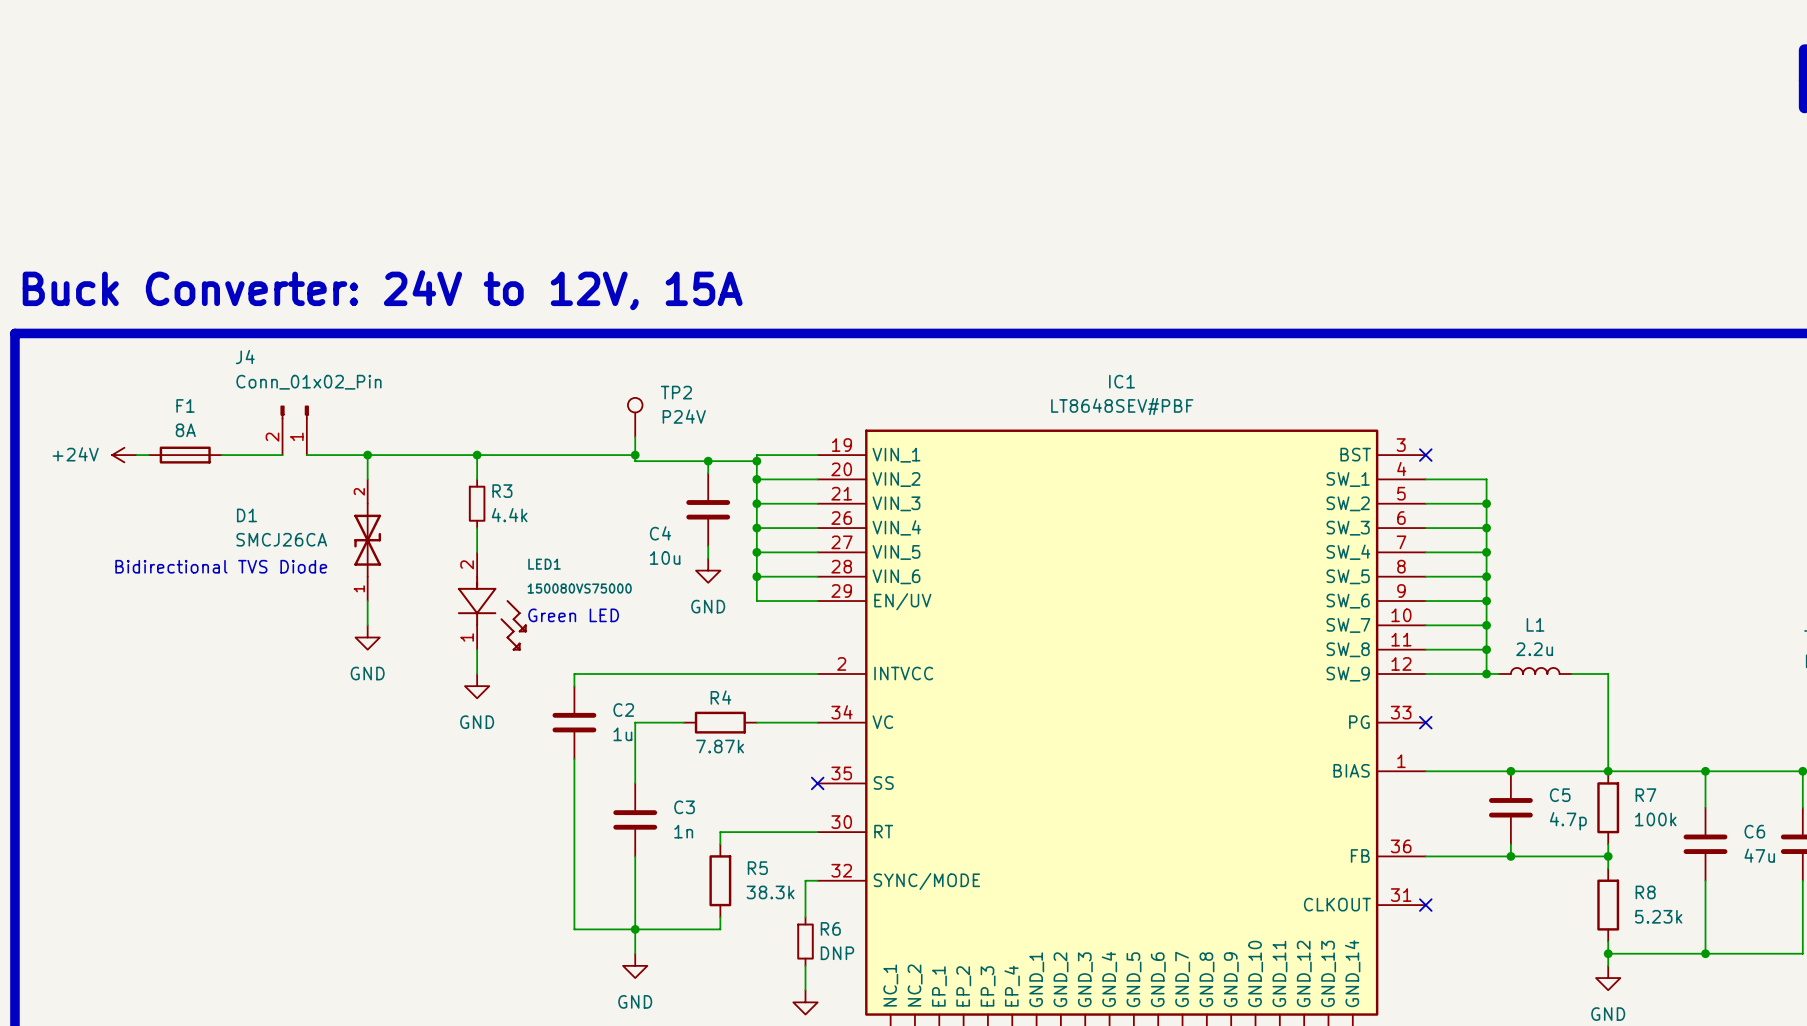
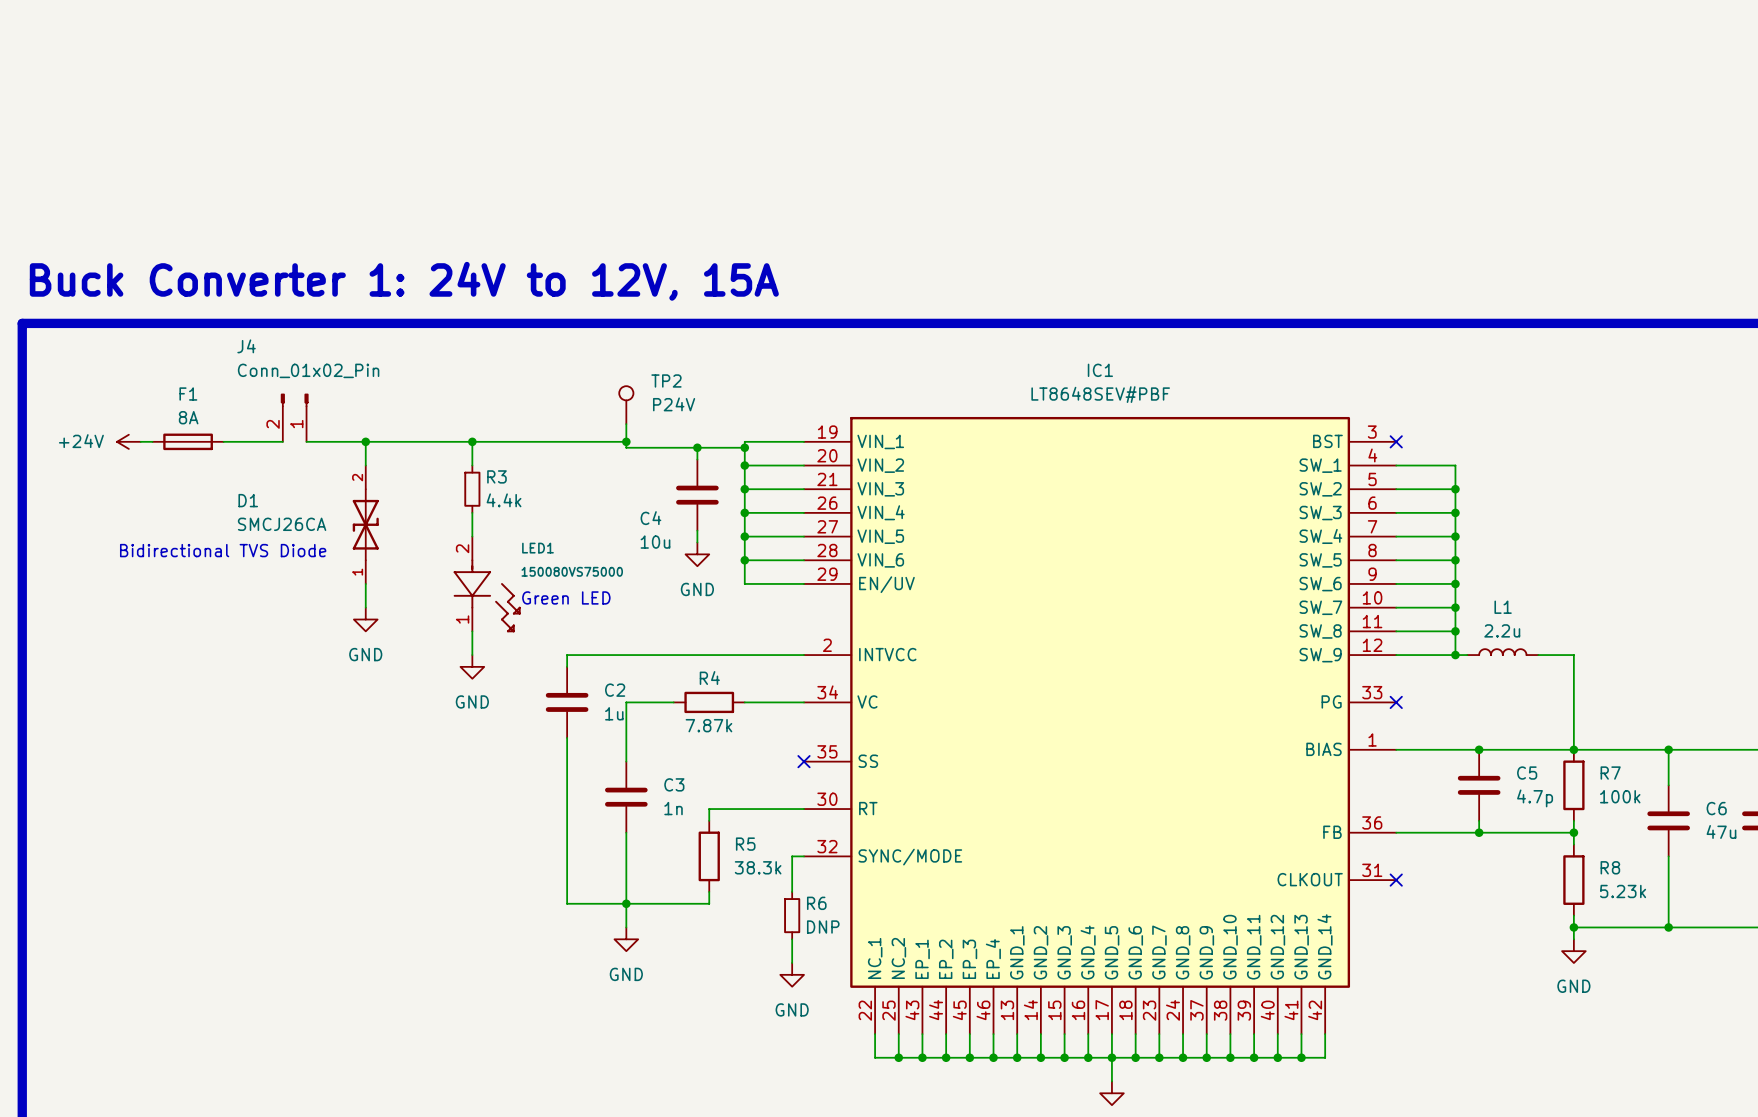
text: Buck Converter: 24V to 12V, 15A (382, 290) -> Buck Converter 1: 24V to 12V, 15A (404, 281)

